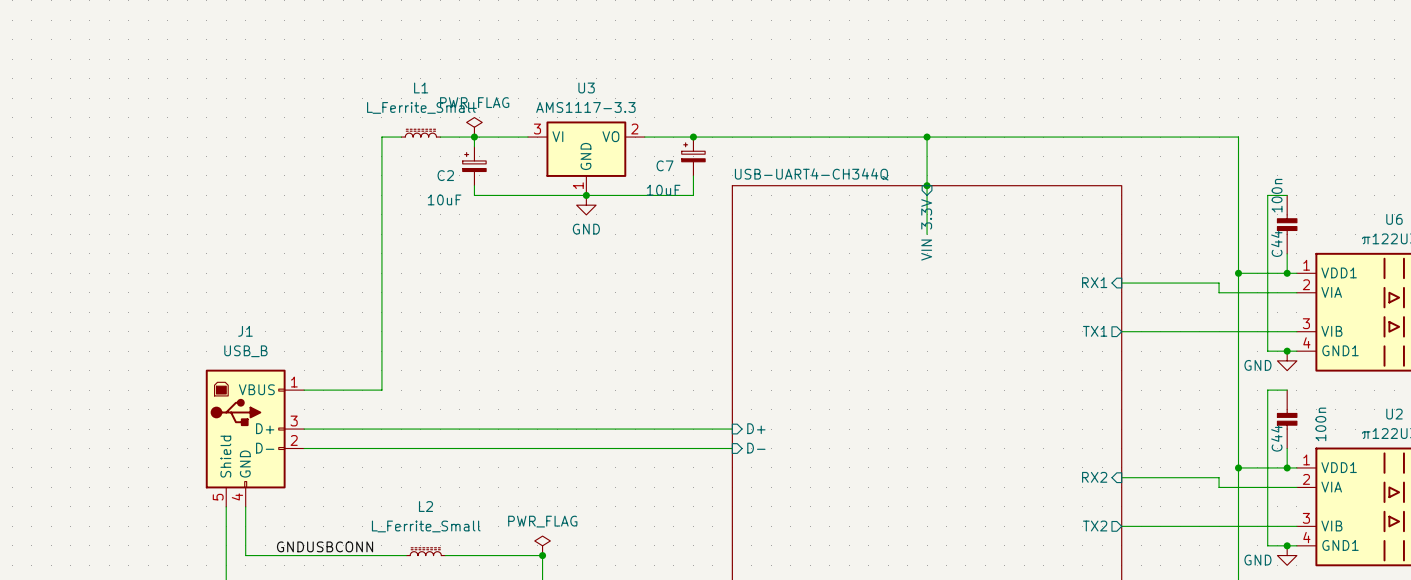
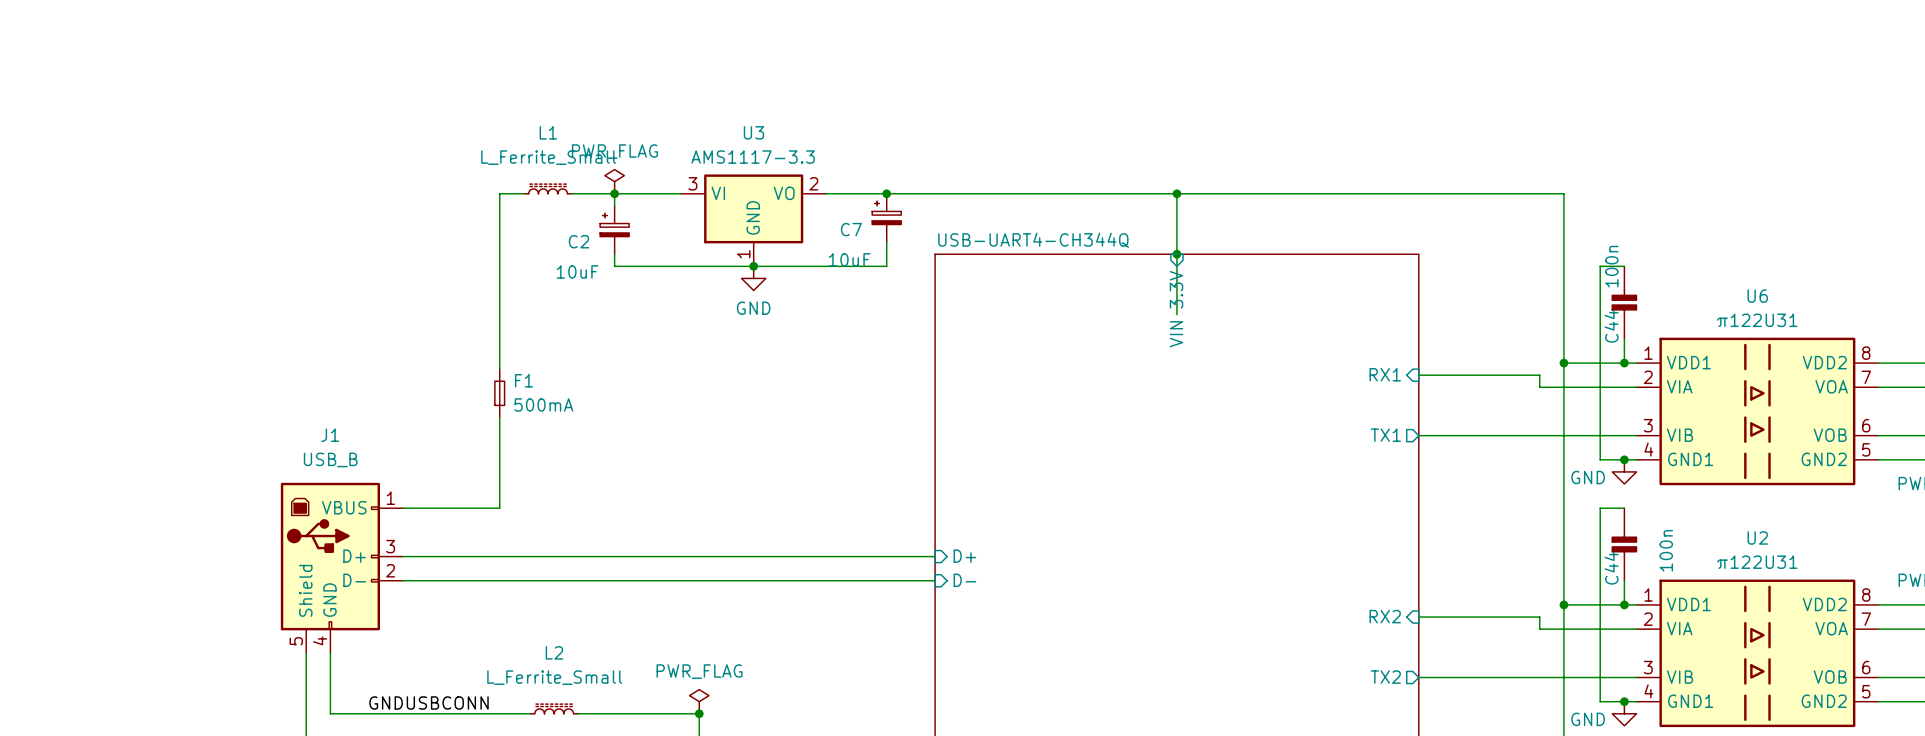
F1: none -> 500mA (499, 393)

